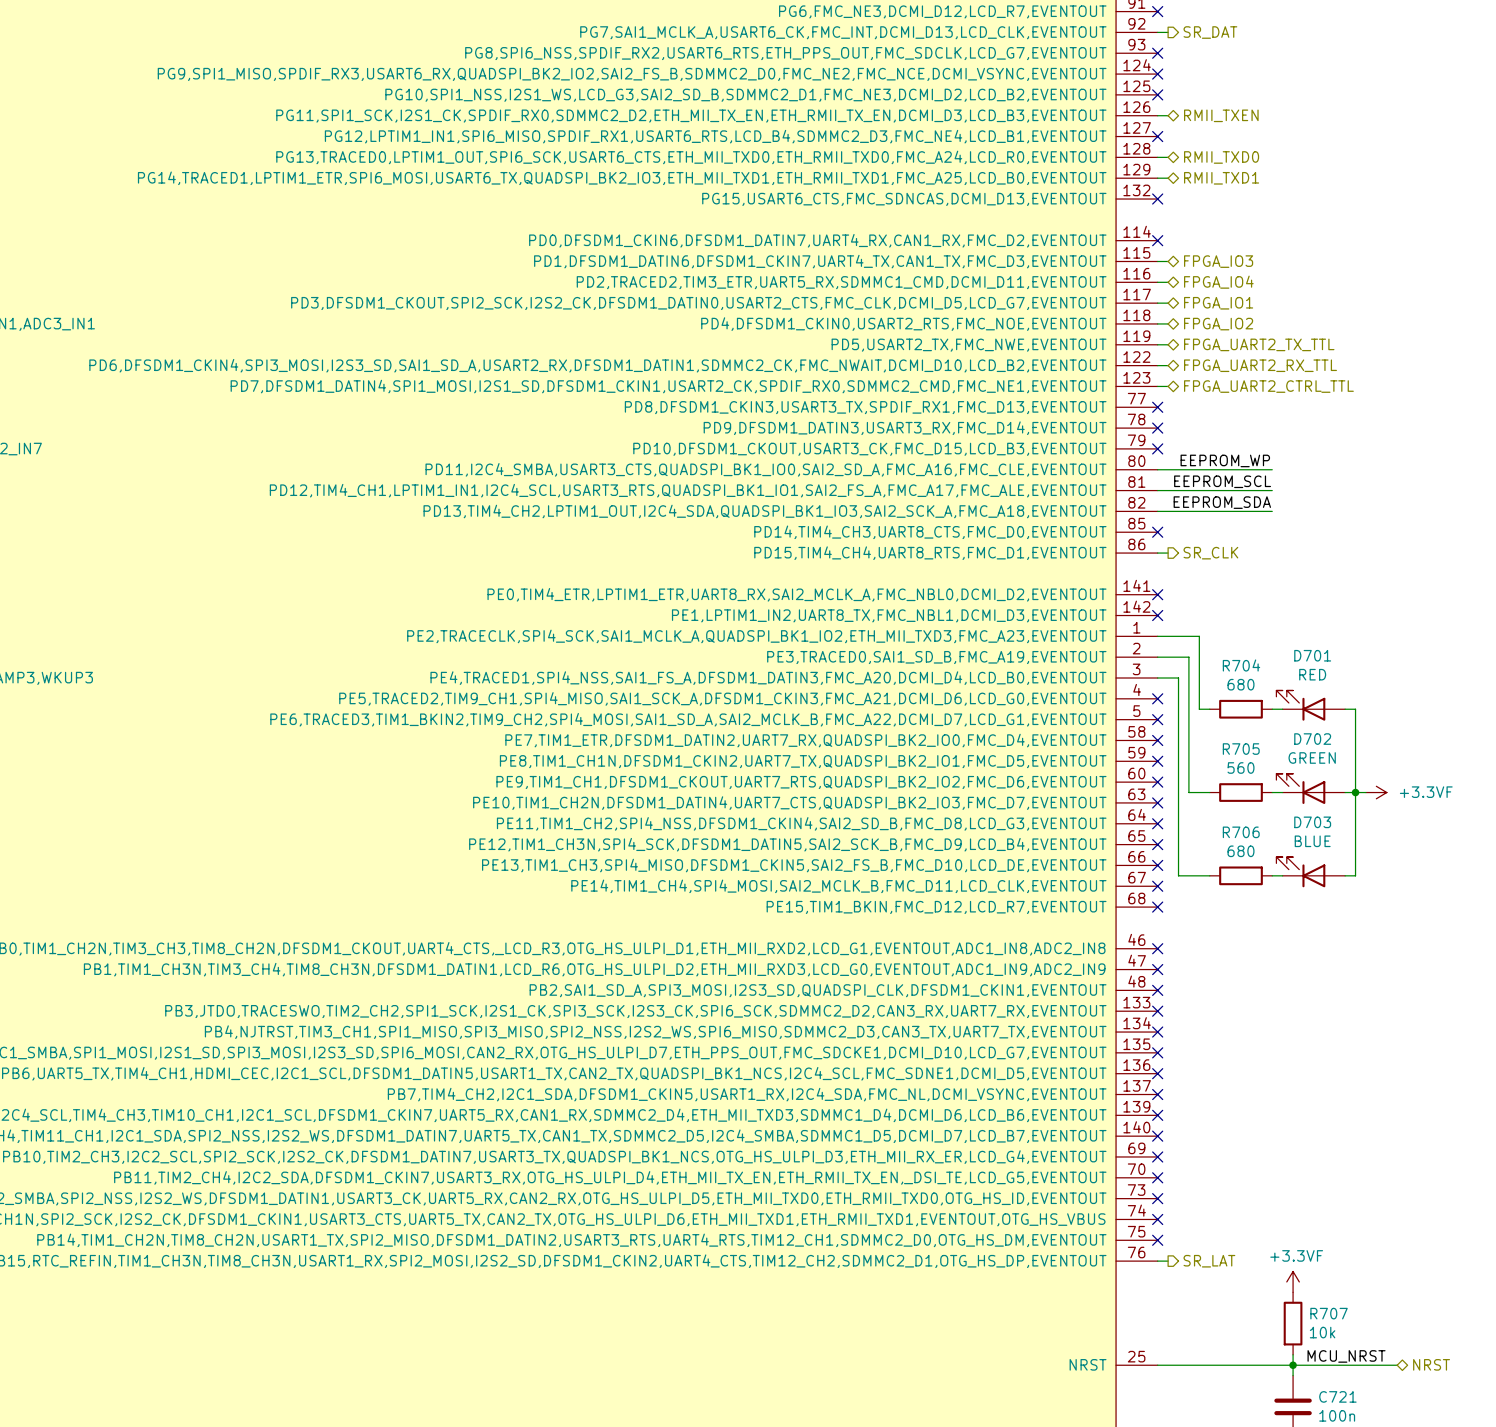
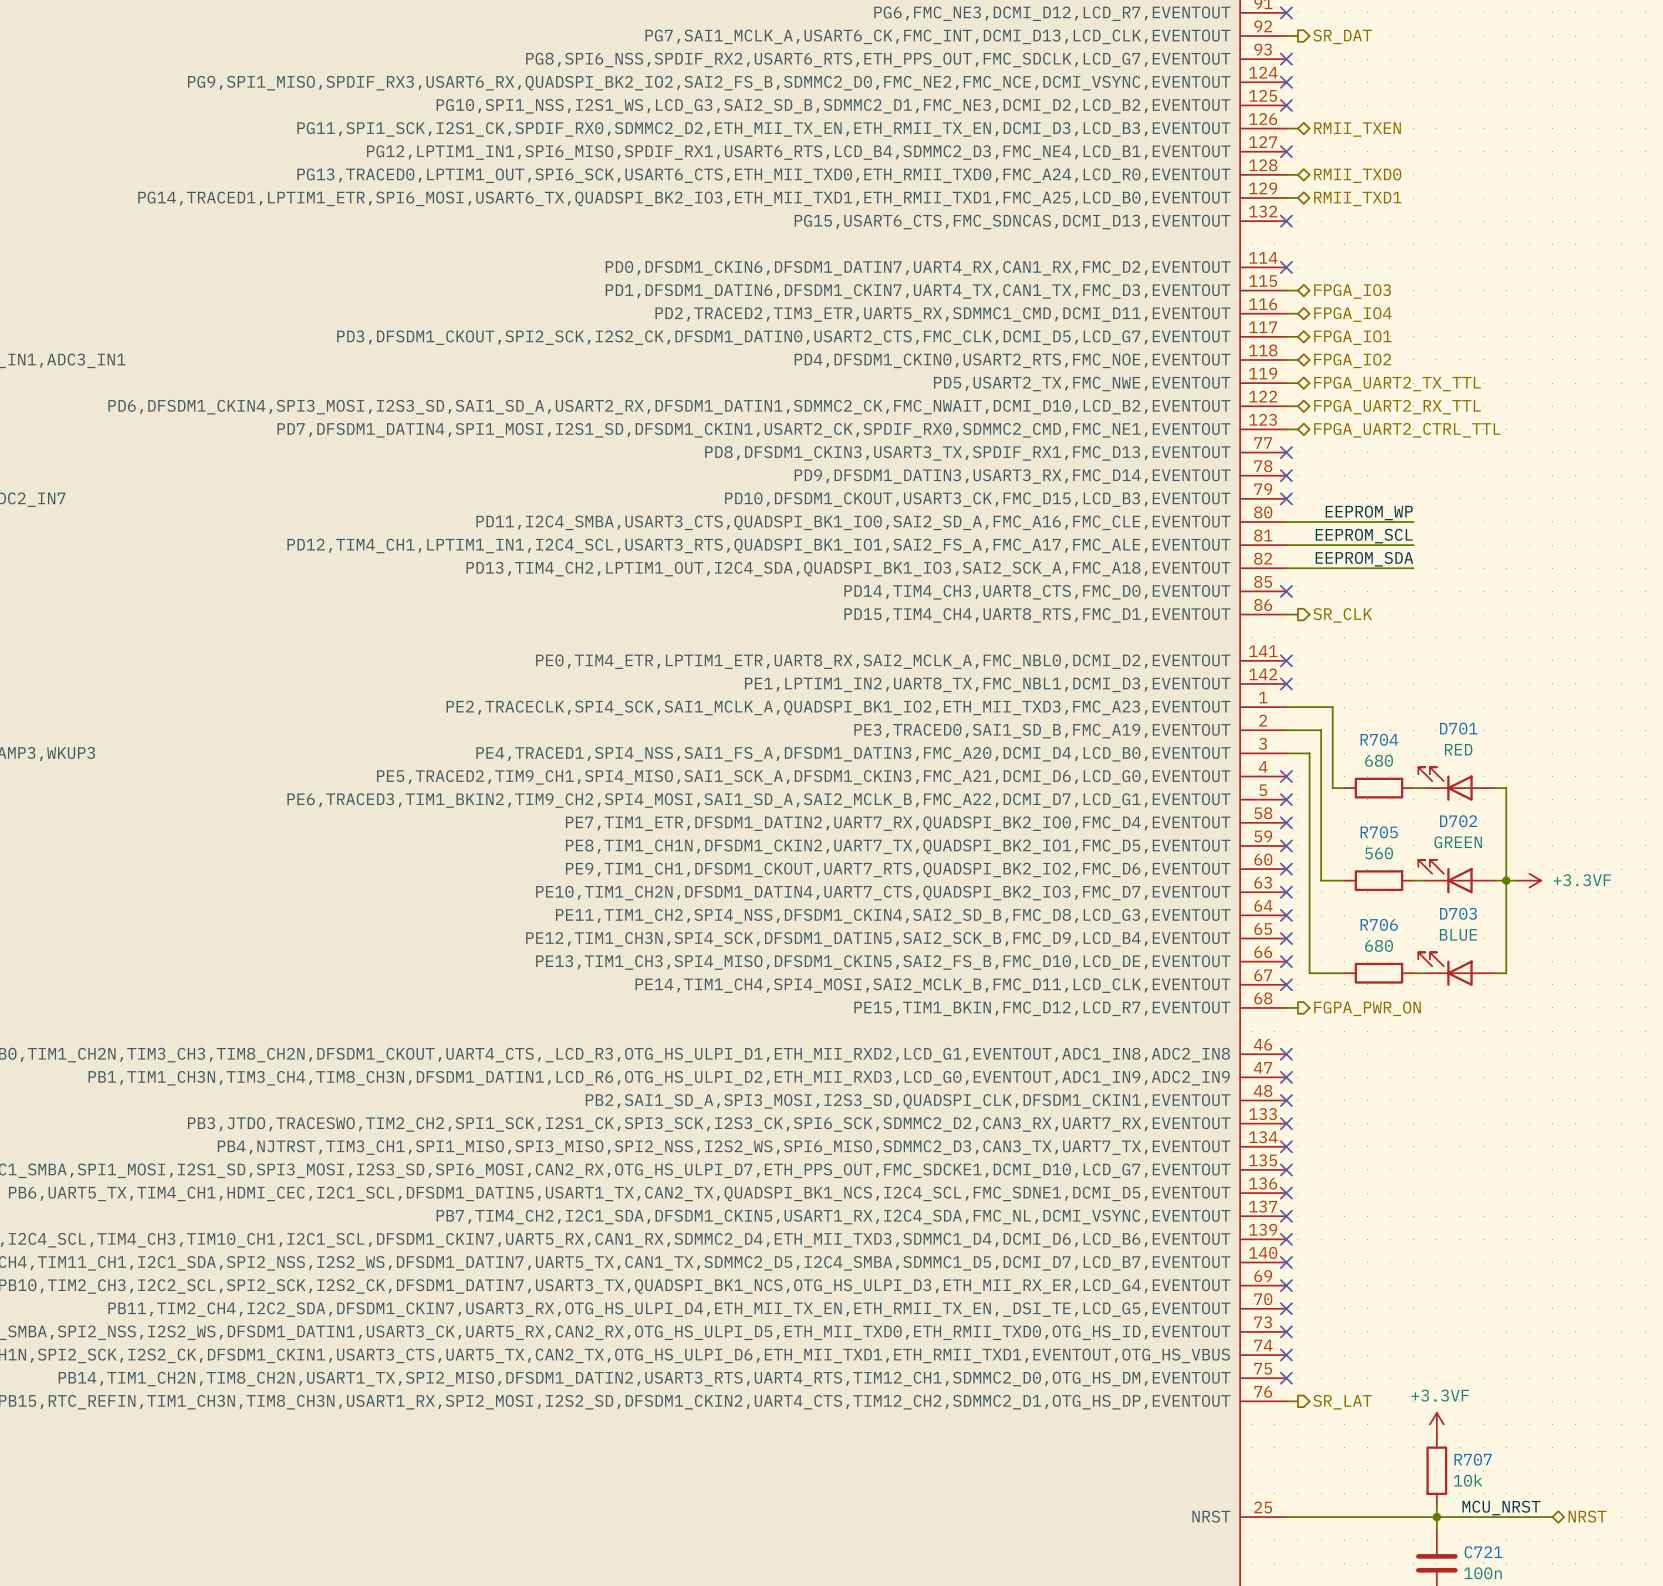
wire: none -> (1286, 1007) (1297, 1007)
no-connect mark: (1157, 907) -> none
hierarchical label: none -> FGPA_PWR_ON (1367, 1008)

